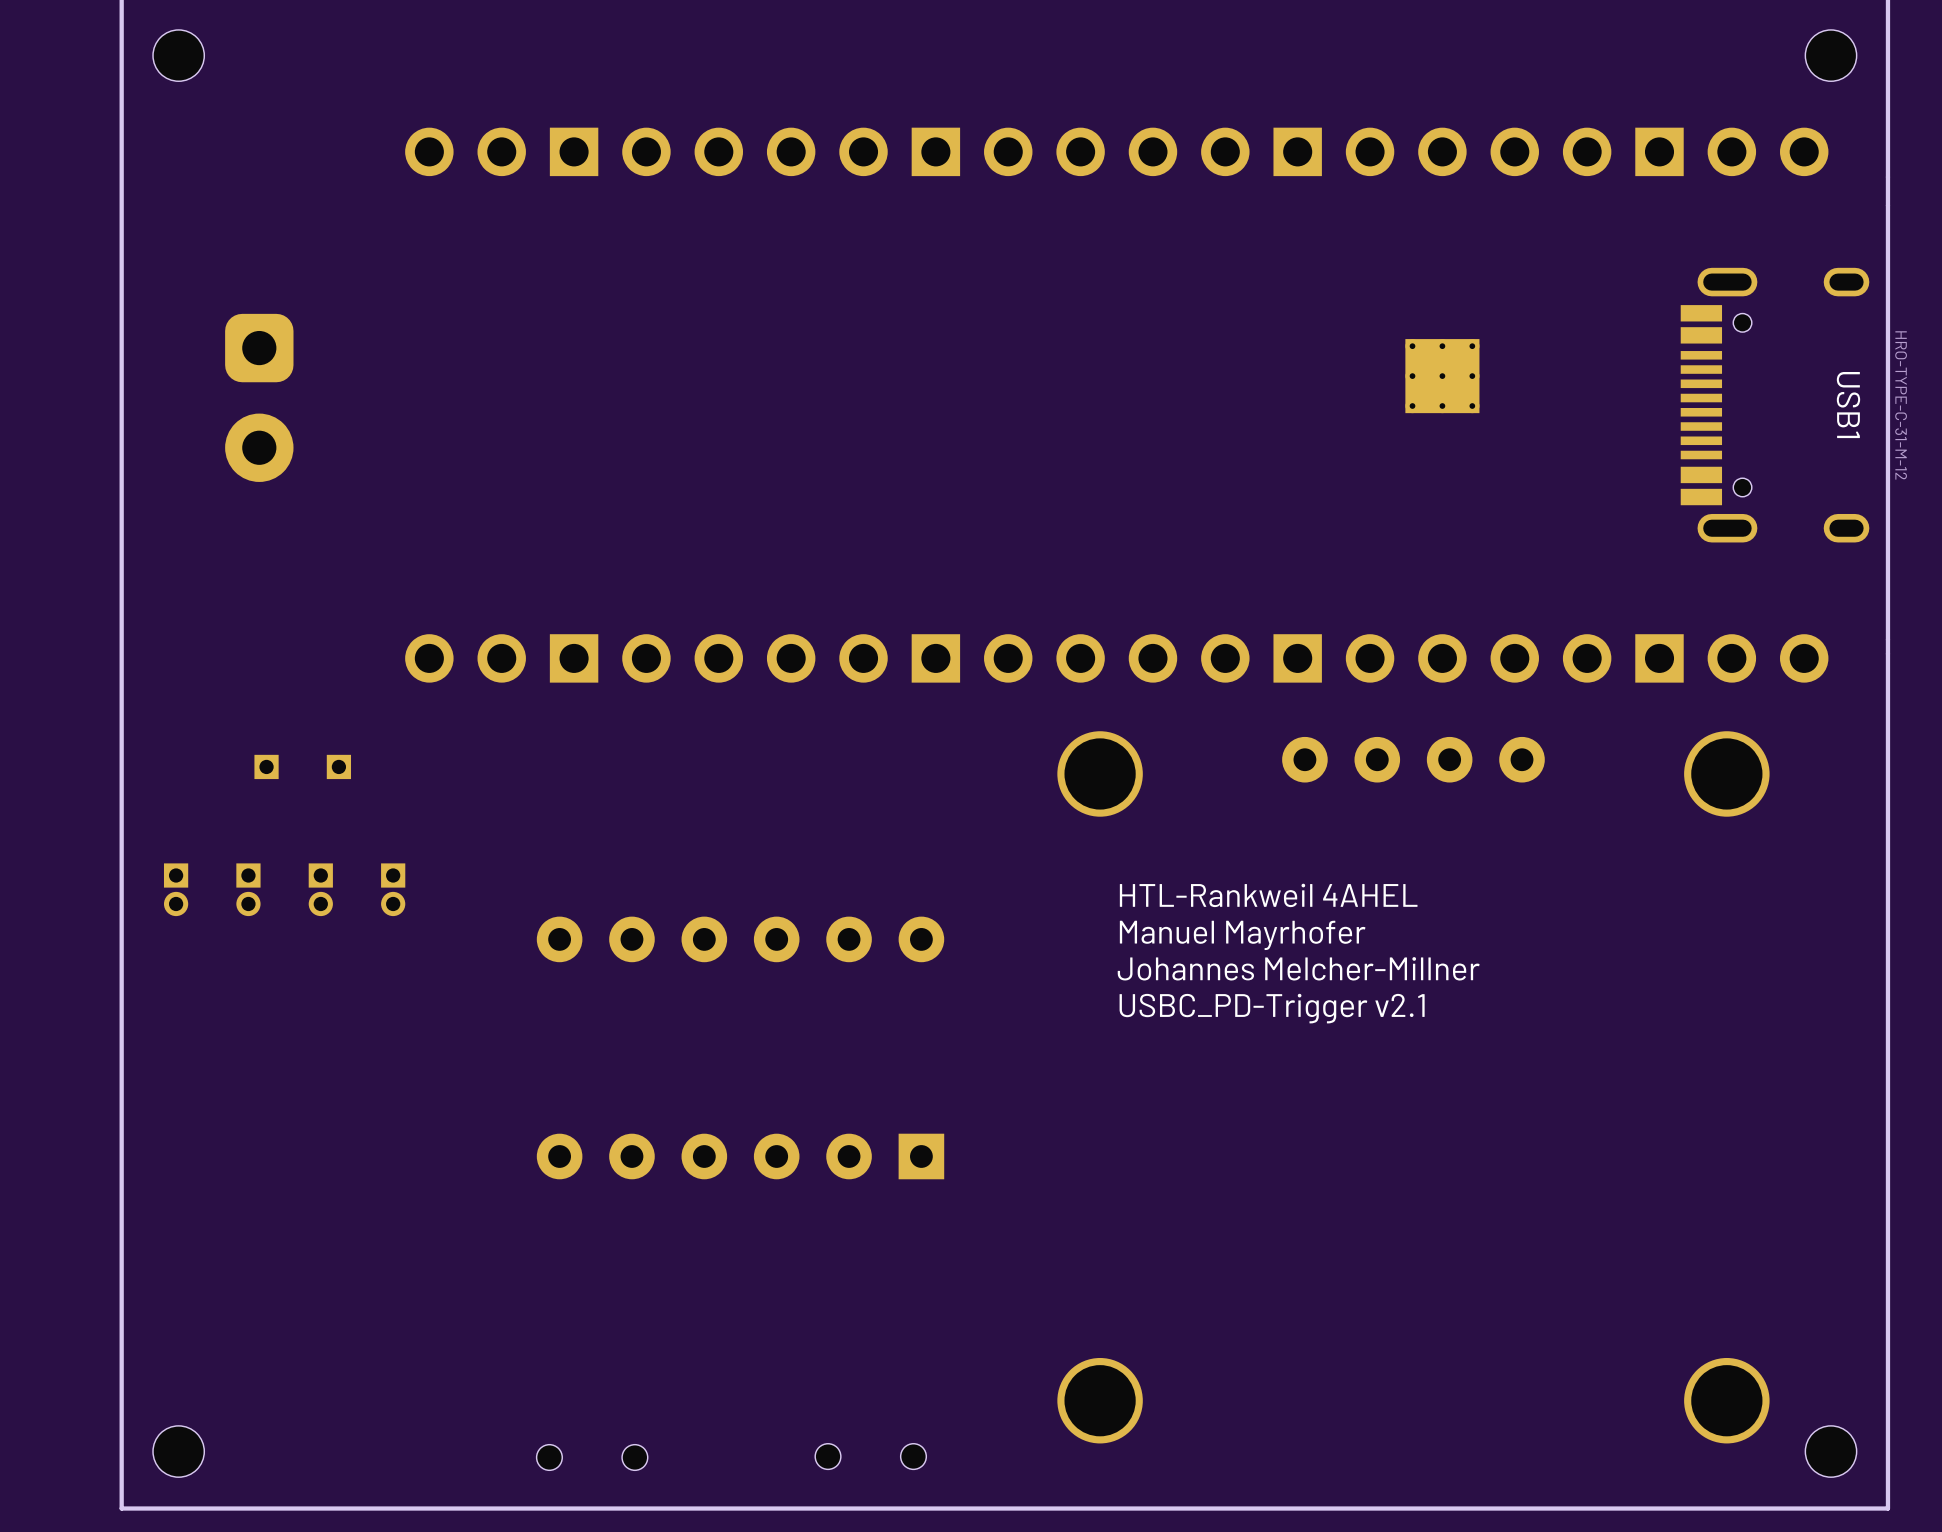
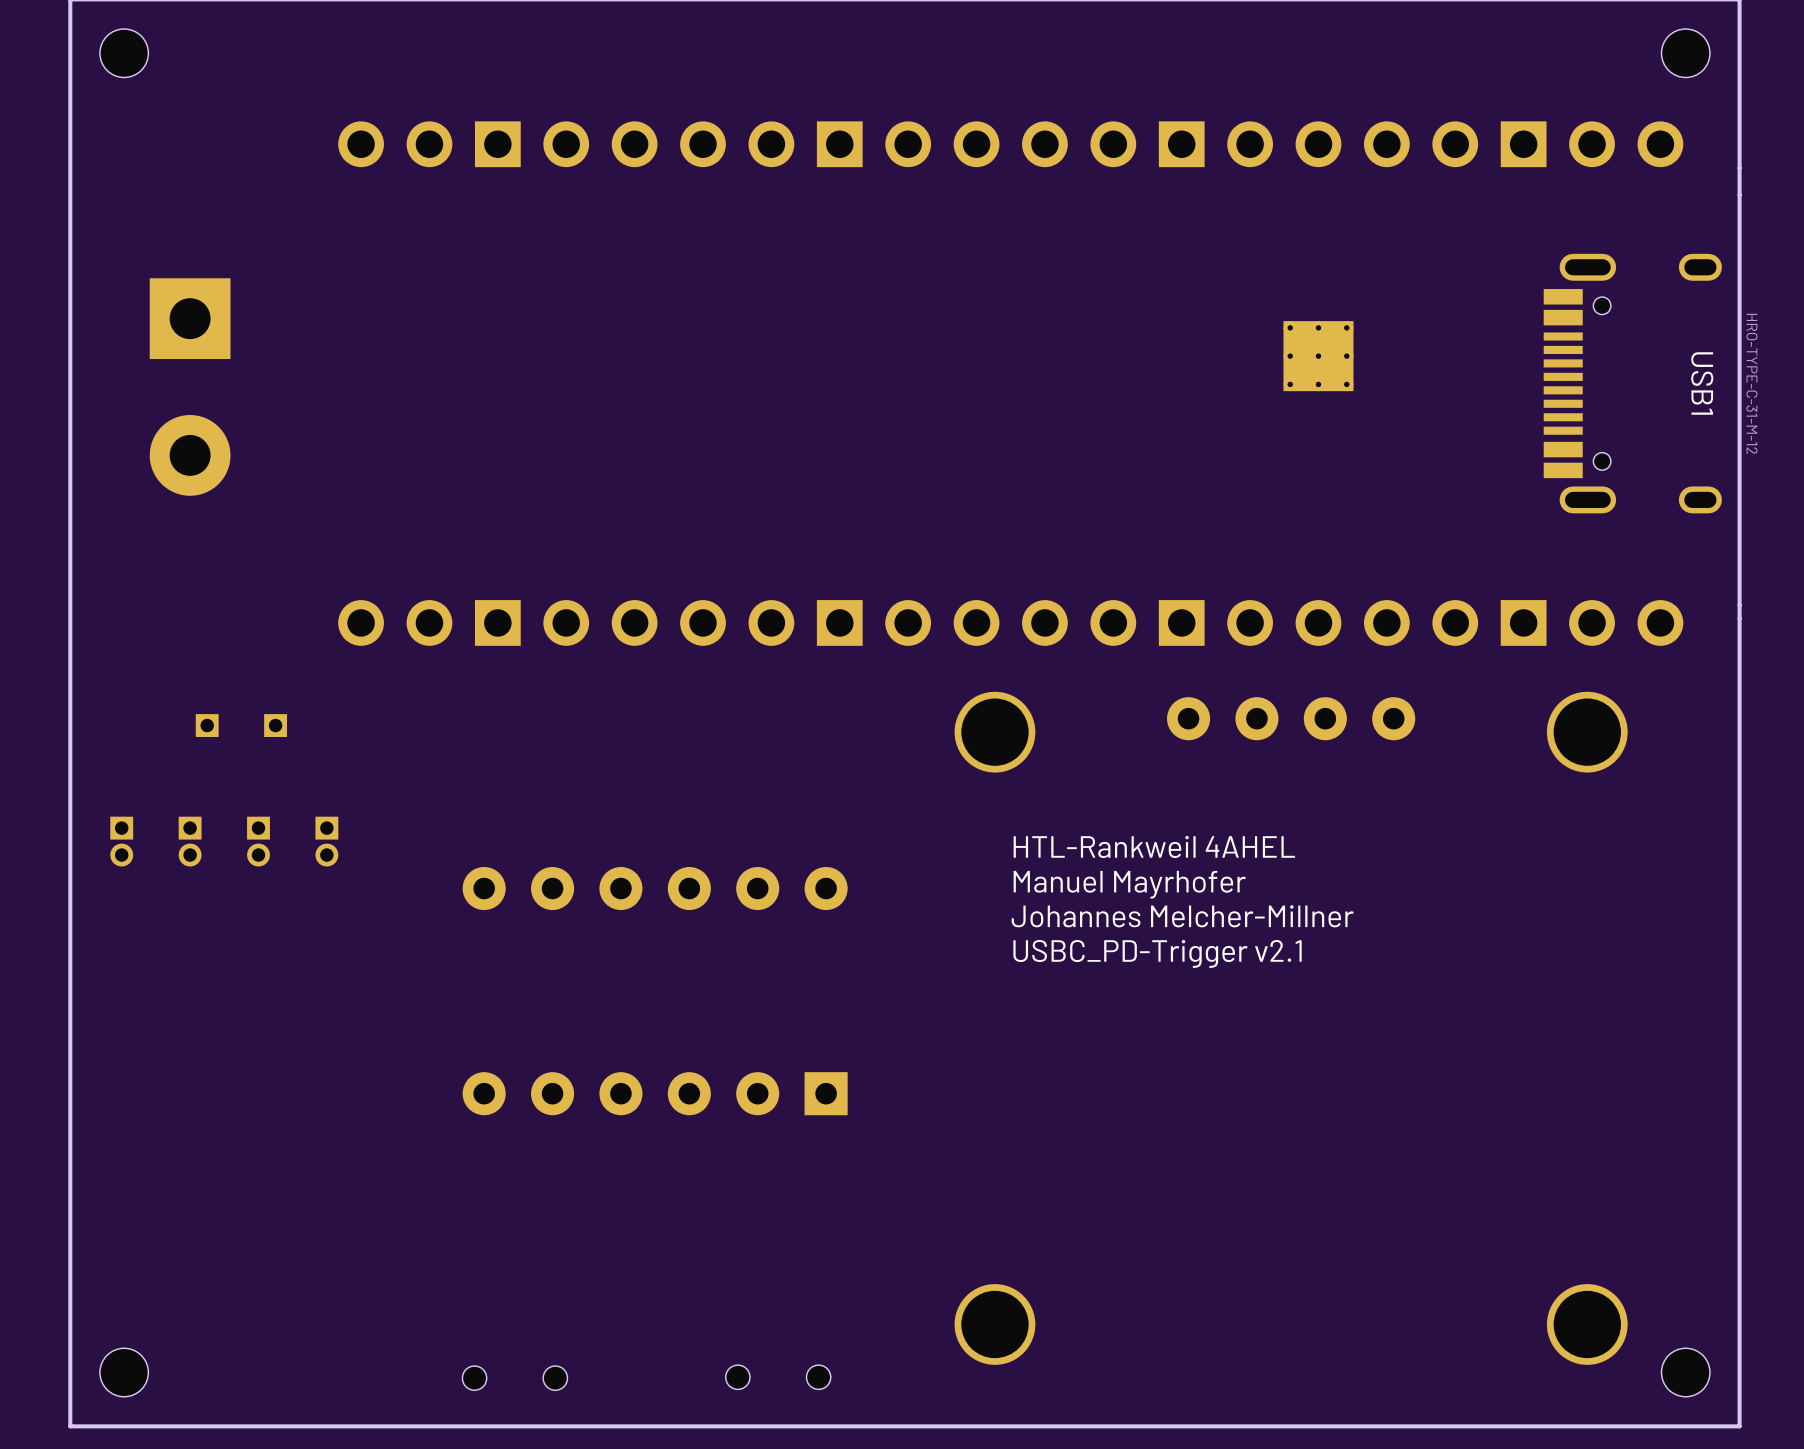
part footprint: [225, 313, 294, 482] -> [149, 278, 231, 496]

